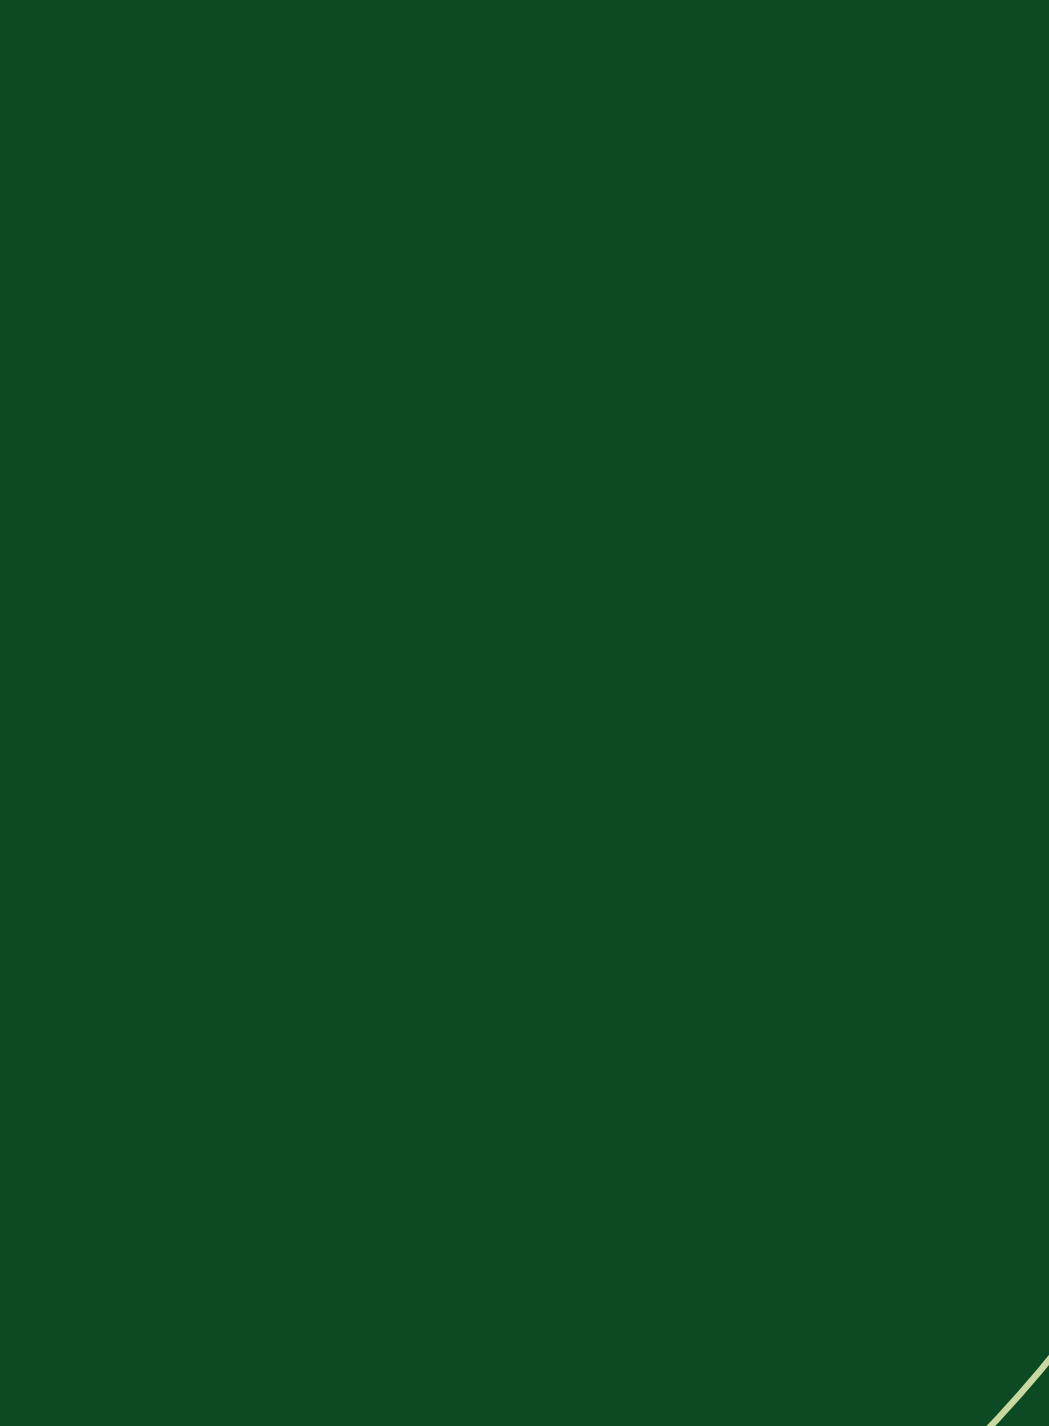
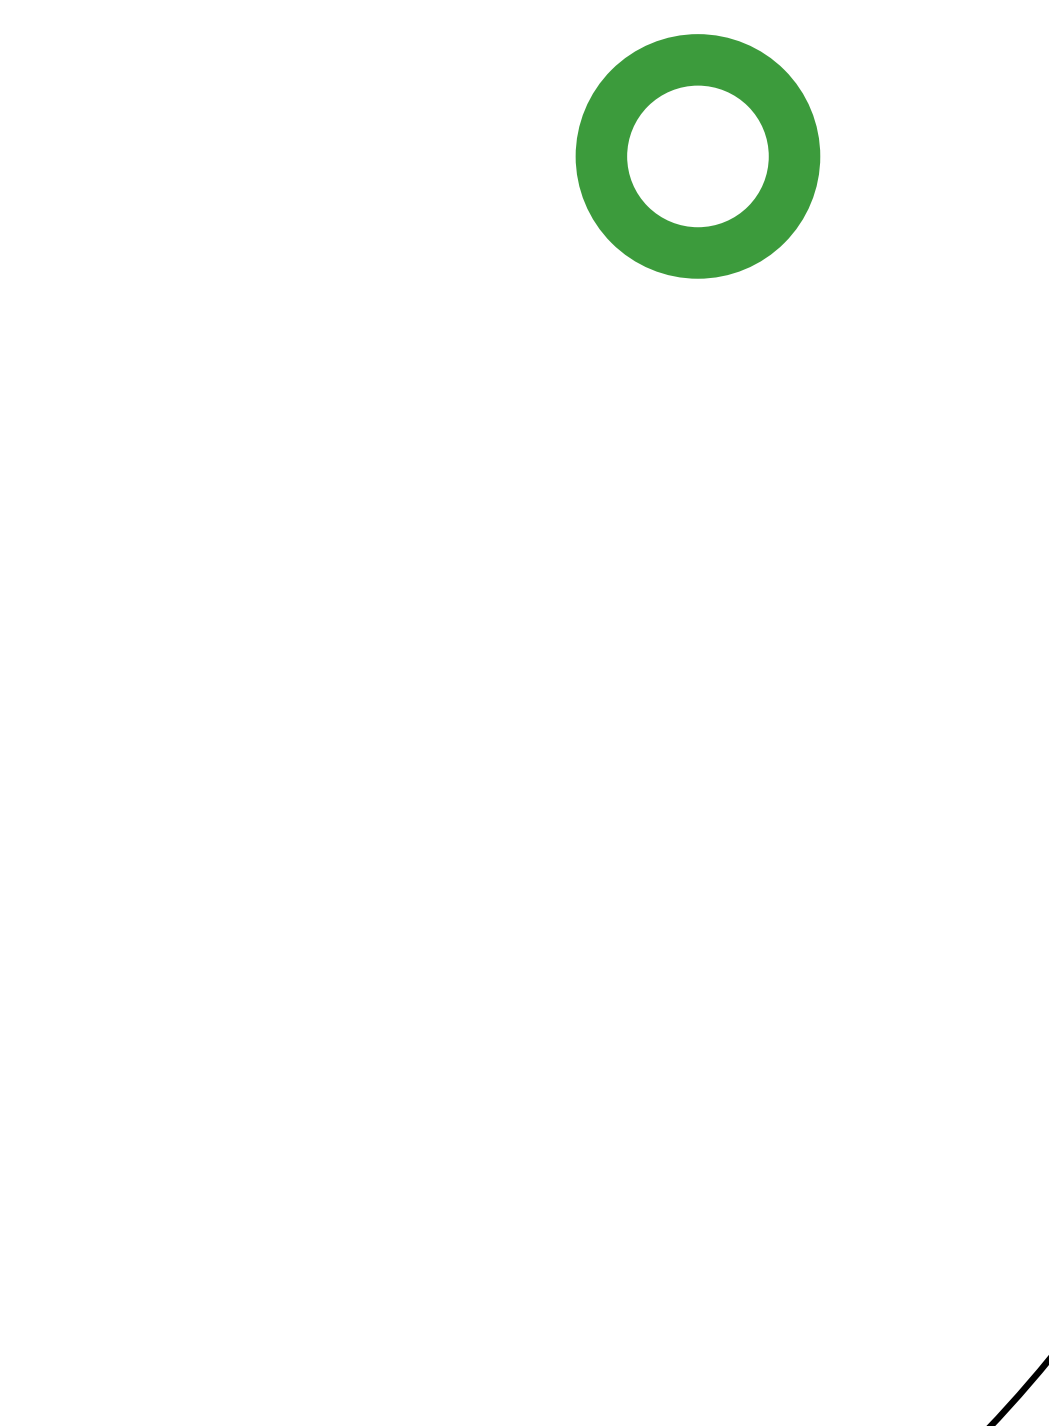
part: none -> (697, 156)

